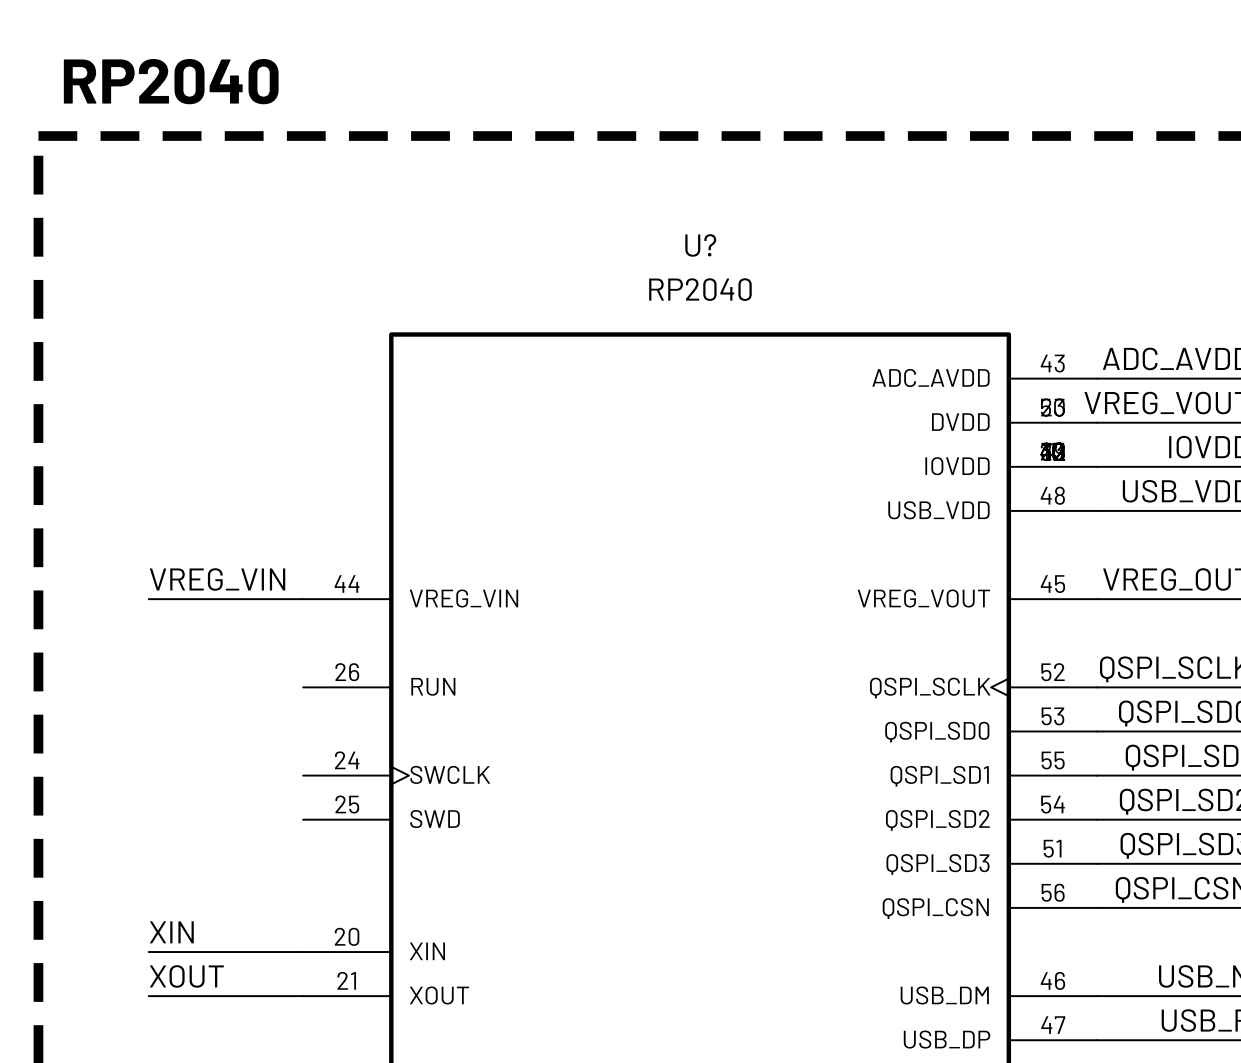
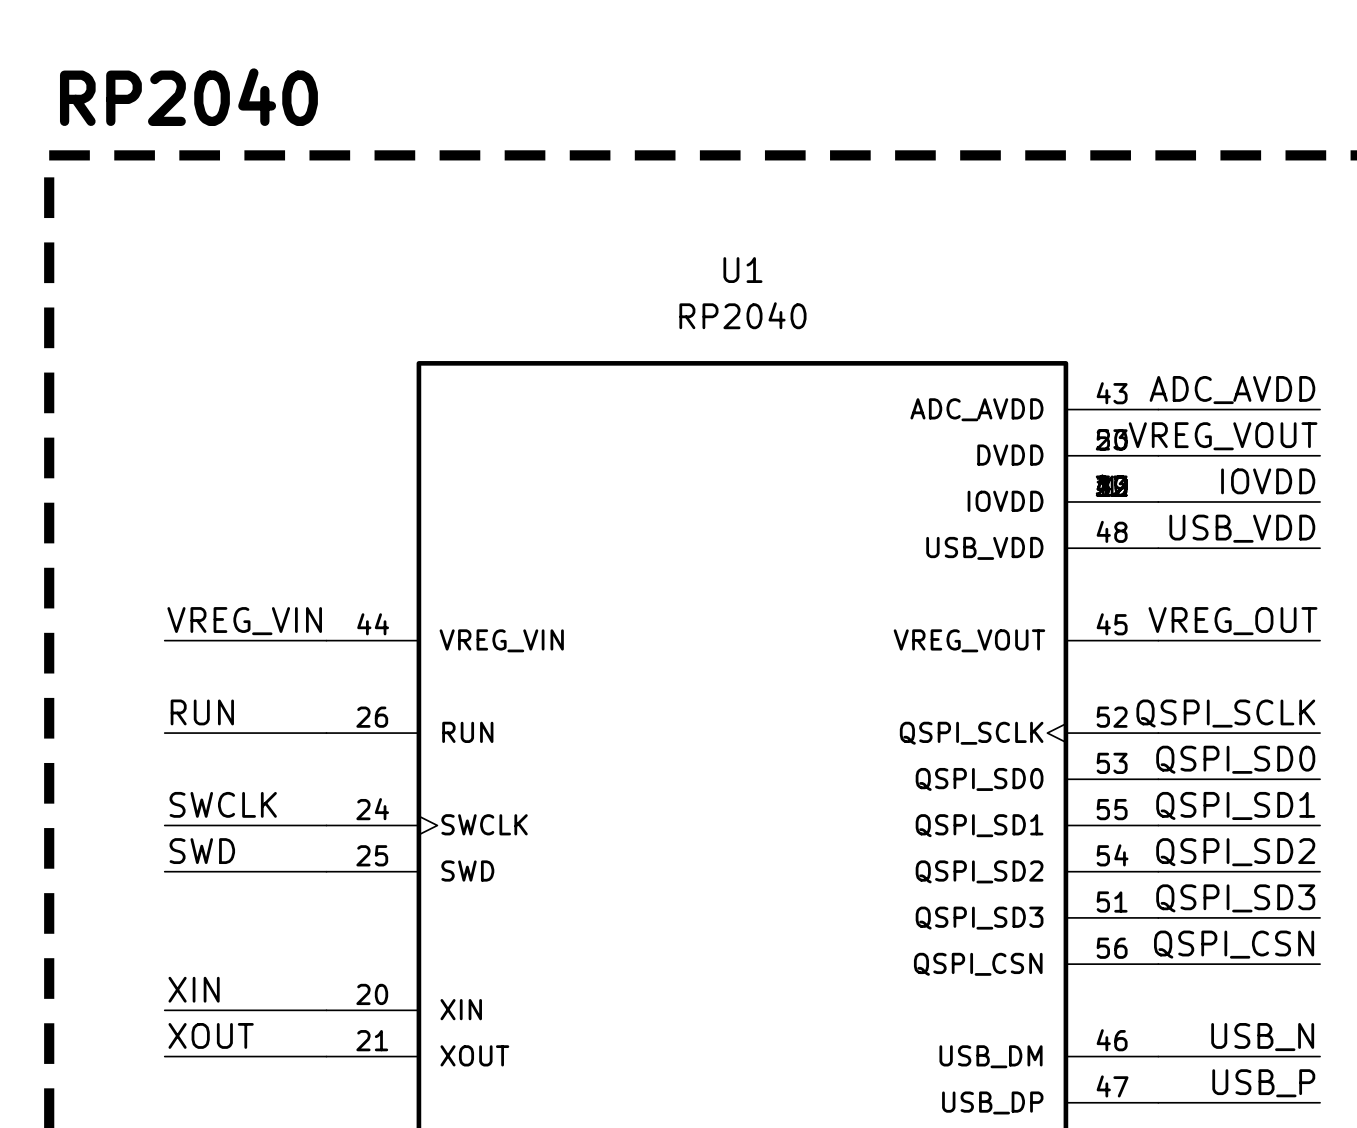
U? name: U? (700, 245) -> U1 (742, 270)
label: none -> RUN (202, 712)
wire: none -> (164, 733) (326, 733)
label: none -> SWCLK (223, 804)
wire: none -> (164, 825) (326, 825)
label: none -> SWD (202, 851)
wire: none -> (164, 871) (326, 871)

